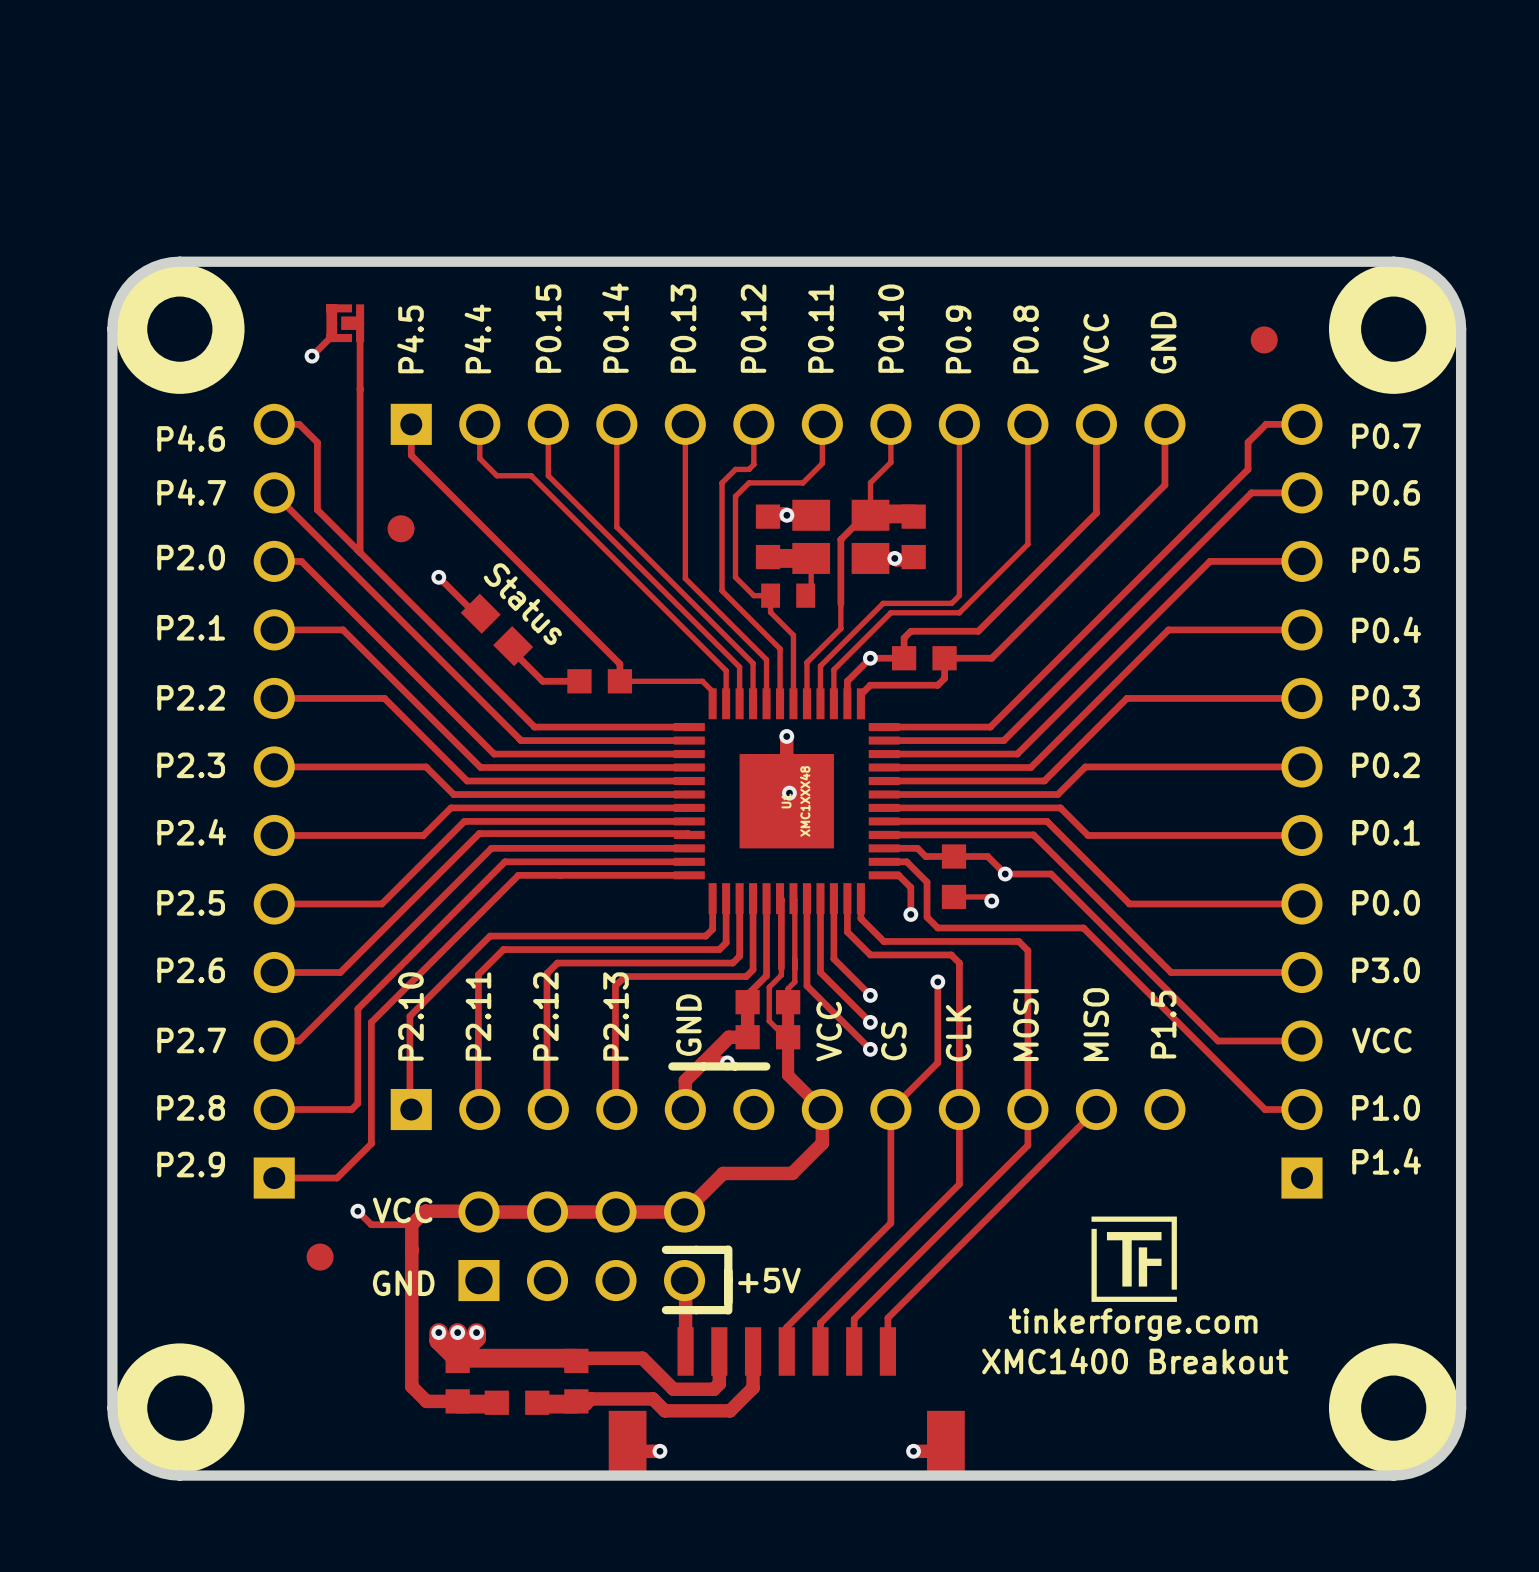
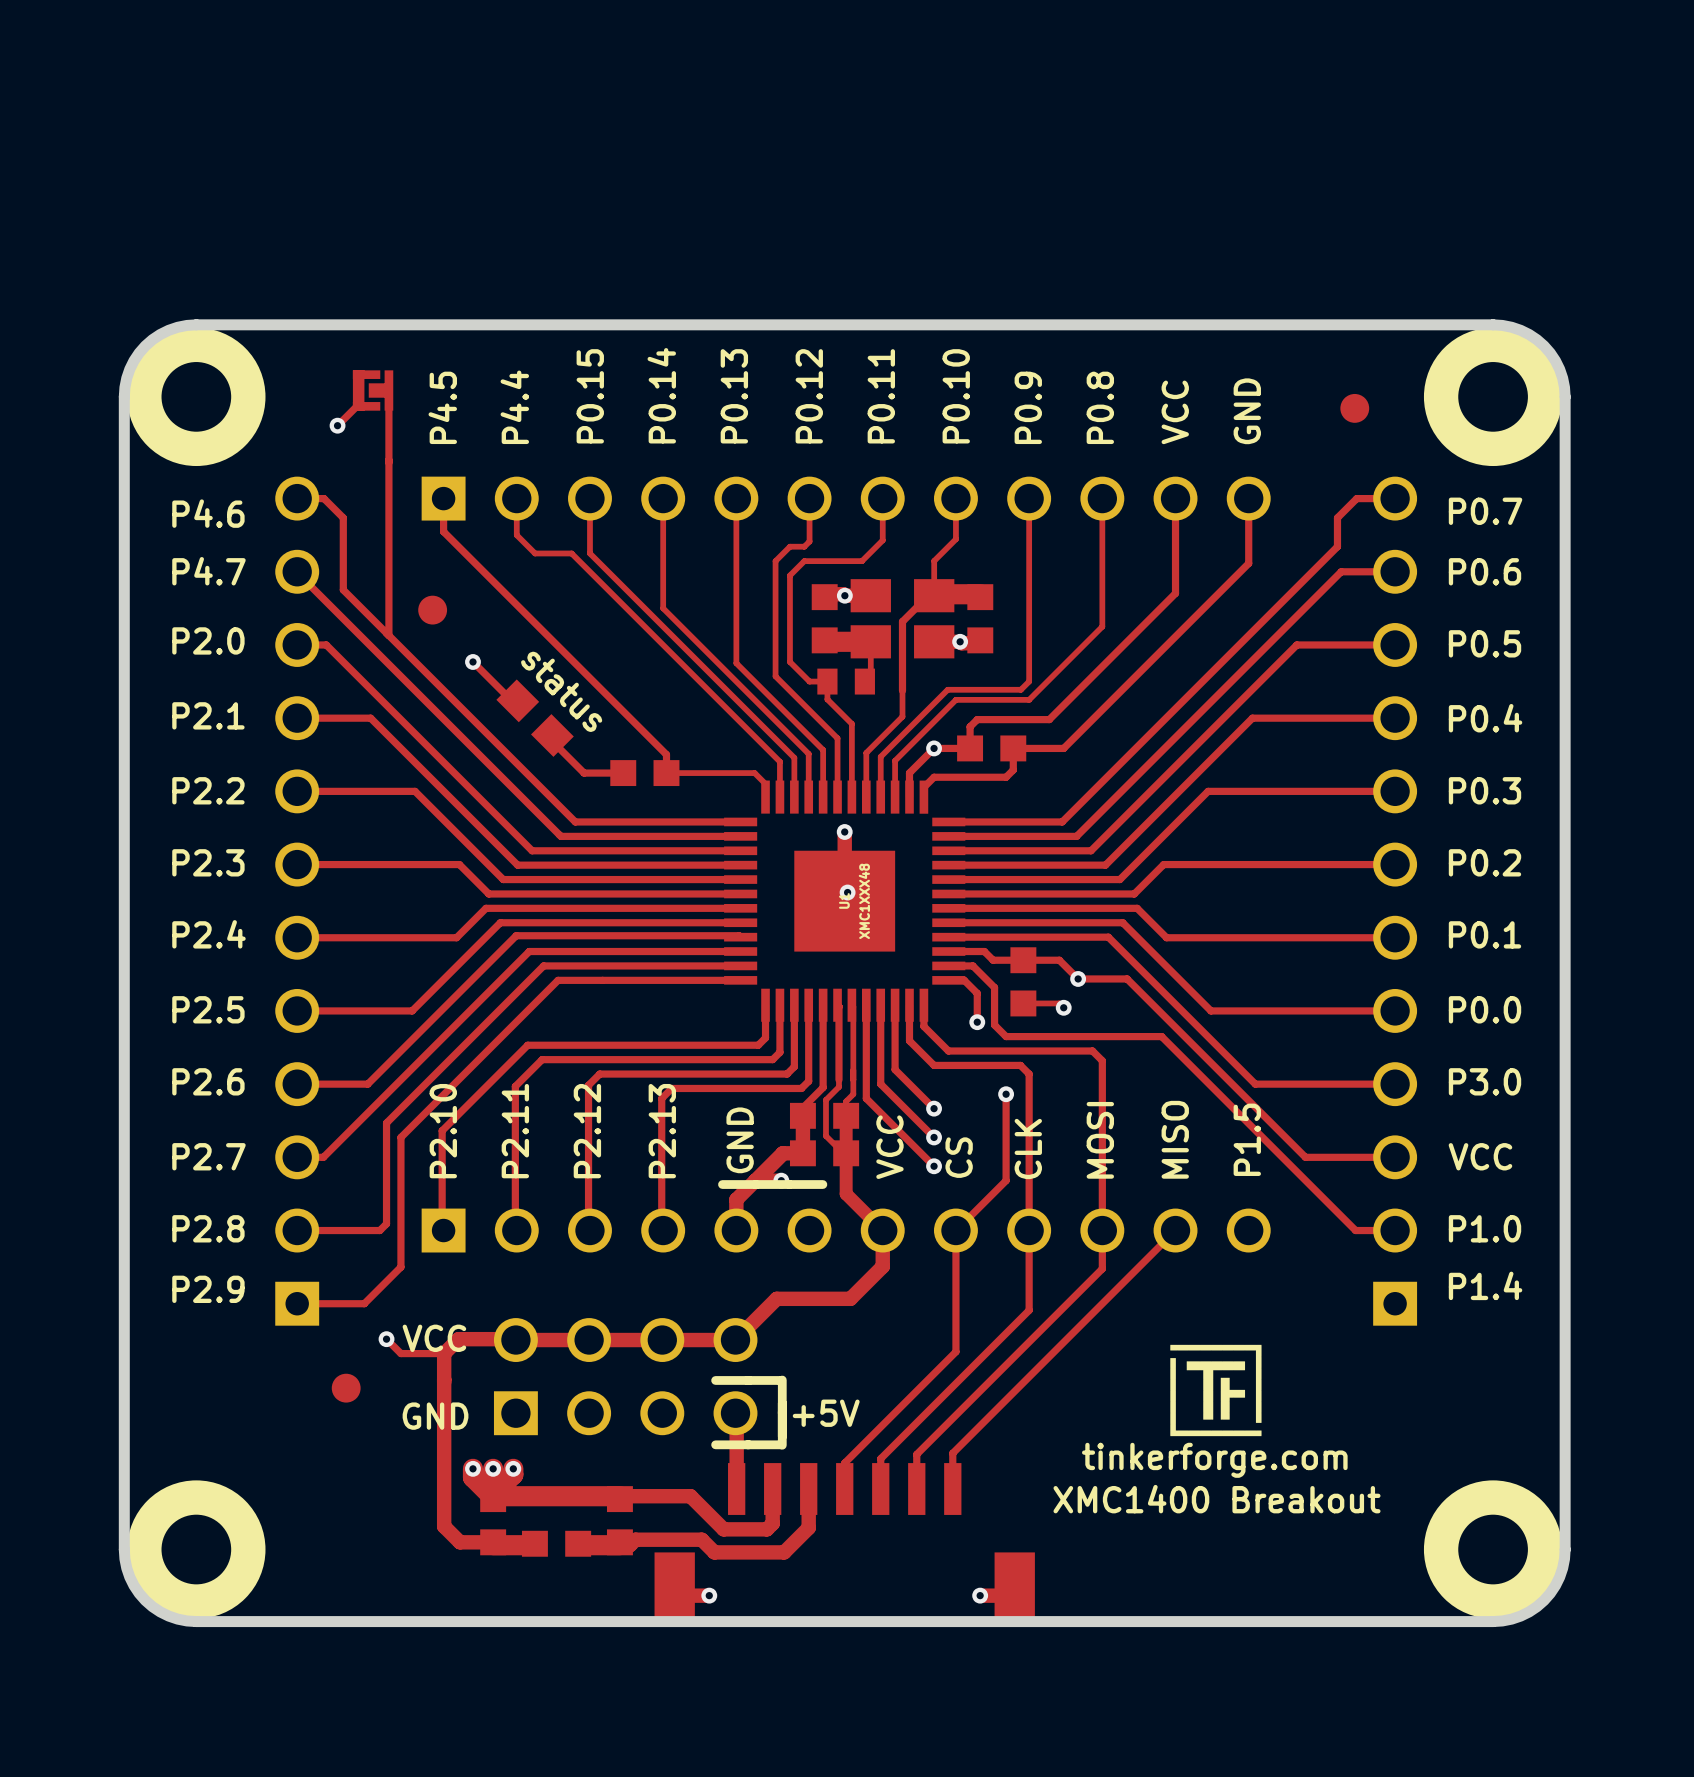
text: Status (522, 604) -> status (561, 691)

